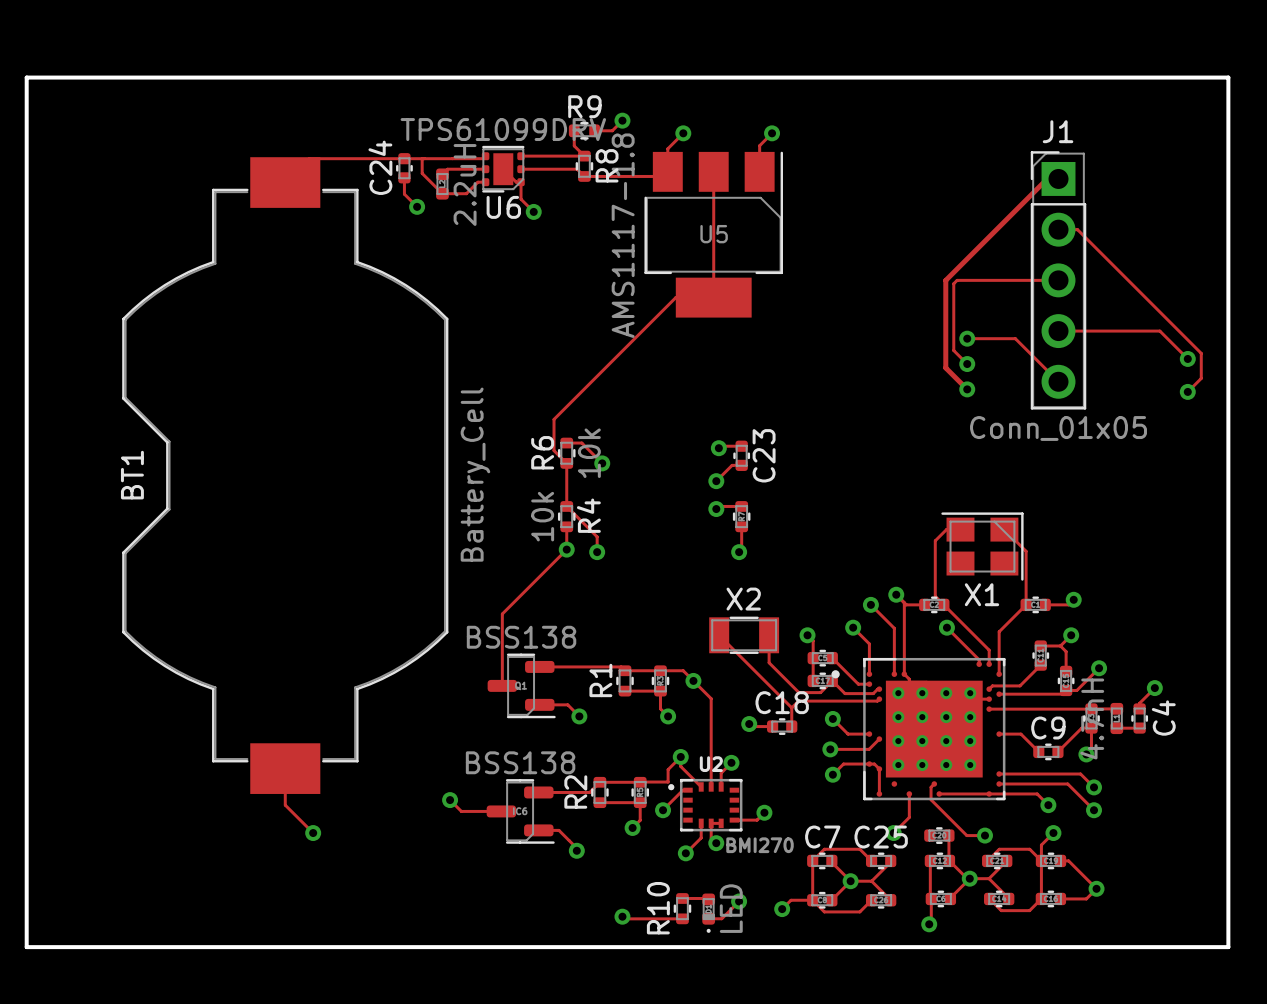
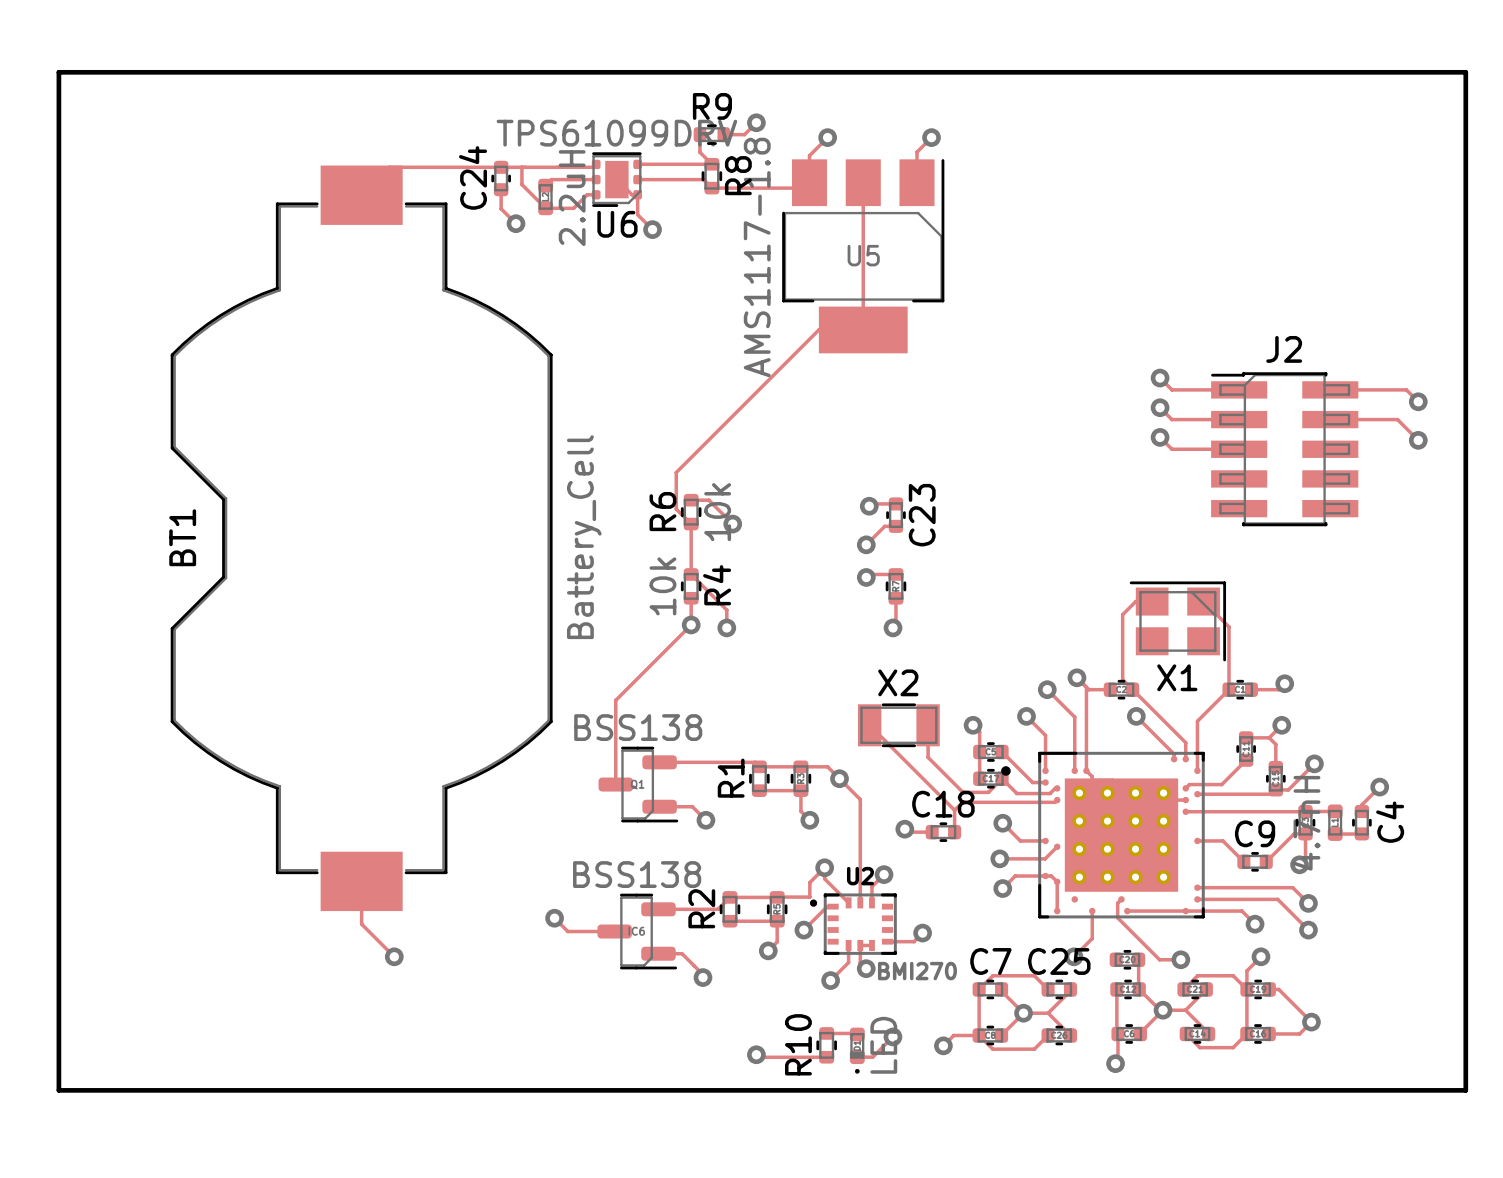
track: (1058, 178) (1047, 178) (945, 280) (945, 367) (967, 389) -> (1239, 449) (1171, 449) (1160, 437)
track: (1058, 229) (1077, 229) (1201, 353) (1201, 378) (1187, 391) -> (1330, 419) (1397, 419) (1418, 440)
track: (1058, 280) (957, 280) (953, 283) (953, 350) (967, 364) -> (1239, 419) (1171, 419) (1160, 407)
J1: Conn_01x05 (1058, 280) -> none
track: (1058, 331) (1159, 331) (1177, 348) -> (1330, 389) (1406, 389)
track: (964, 338) (1015, 338) (1058, 381) -> none
track: none -> (1160, 378) (1171, 389) (1239, 389)
J2: none -> (1284, 449)

